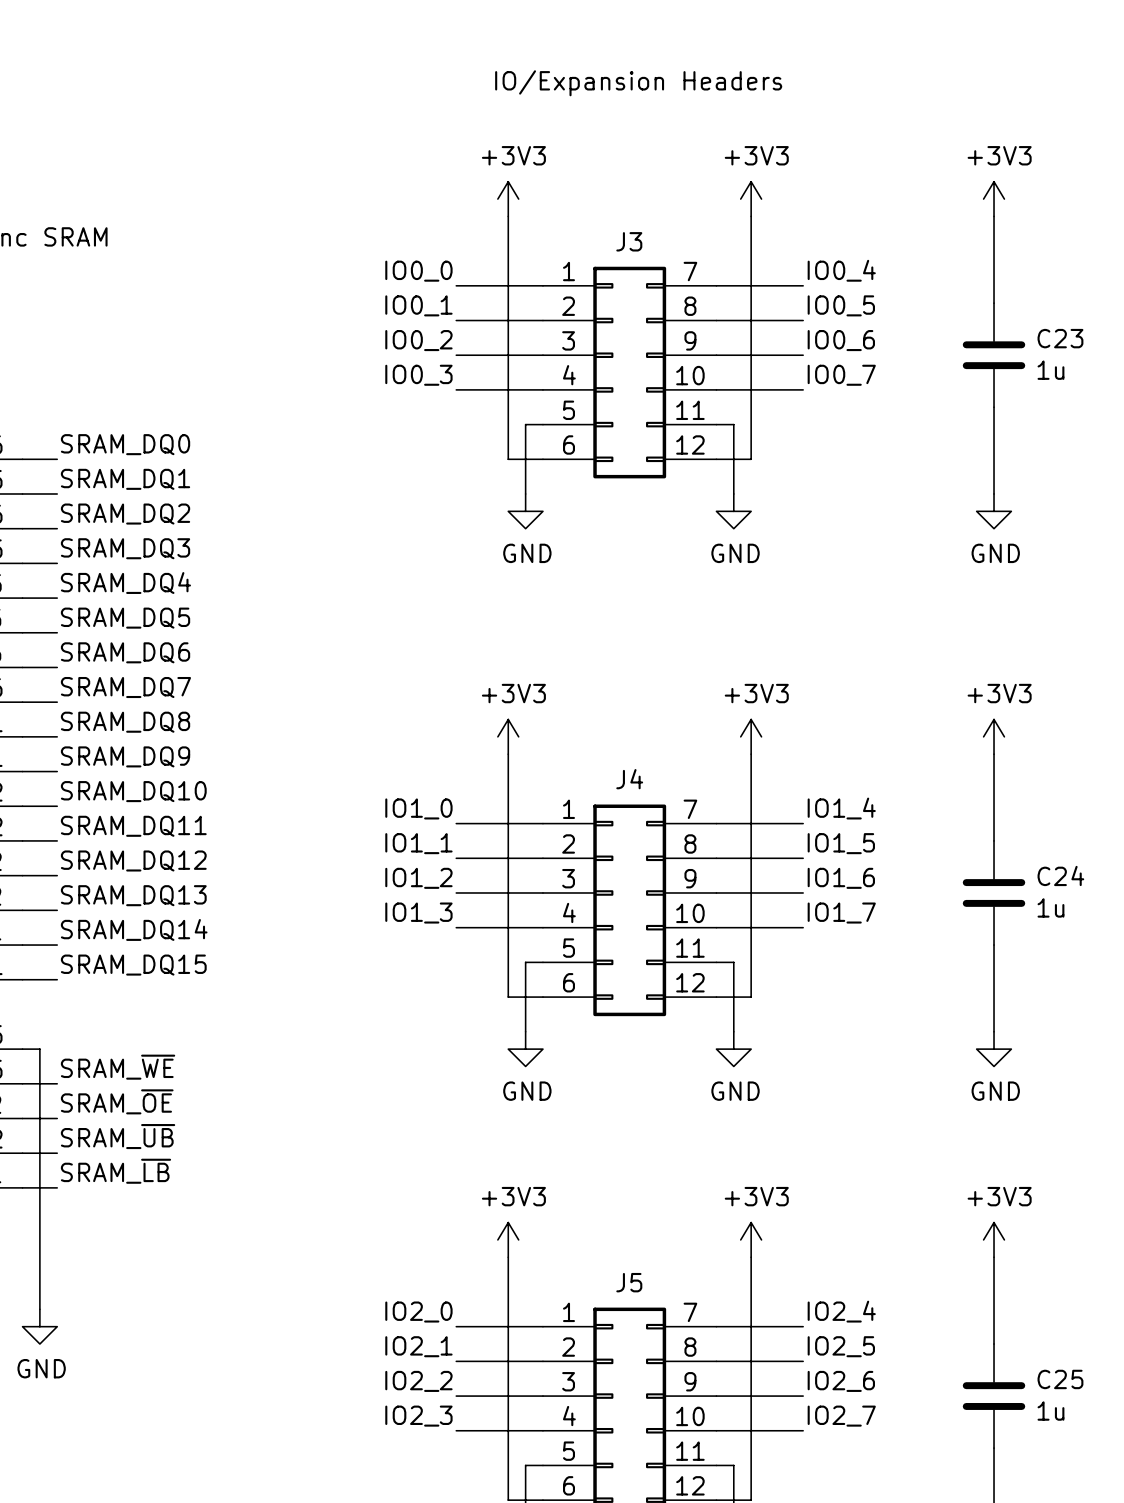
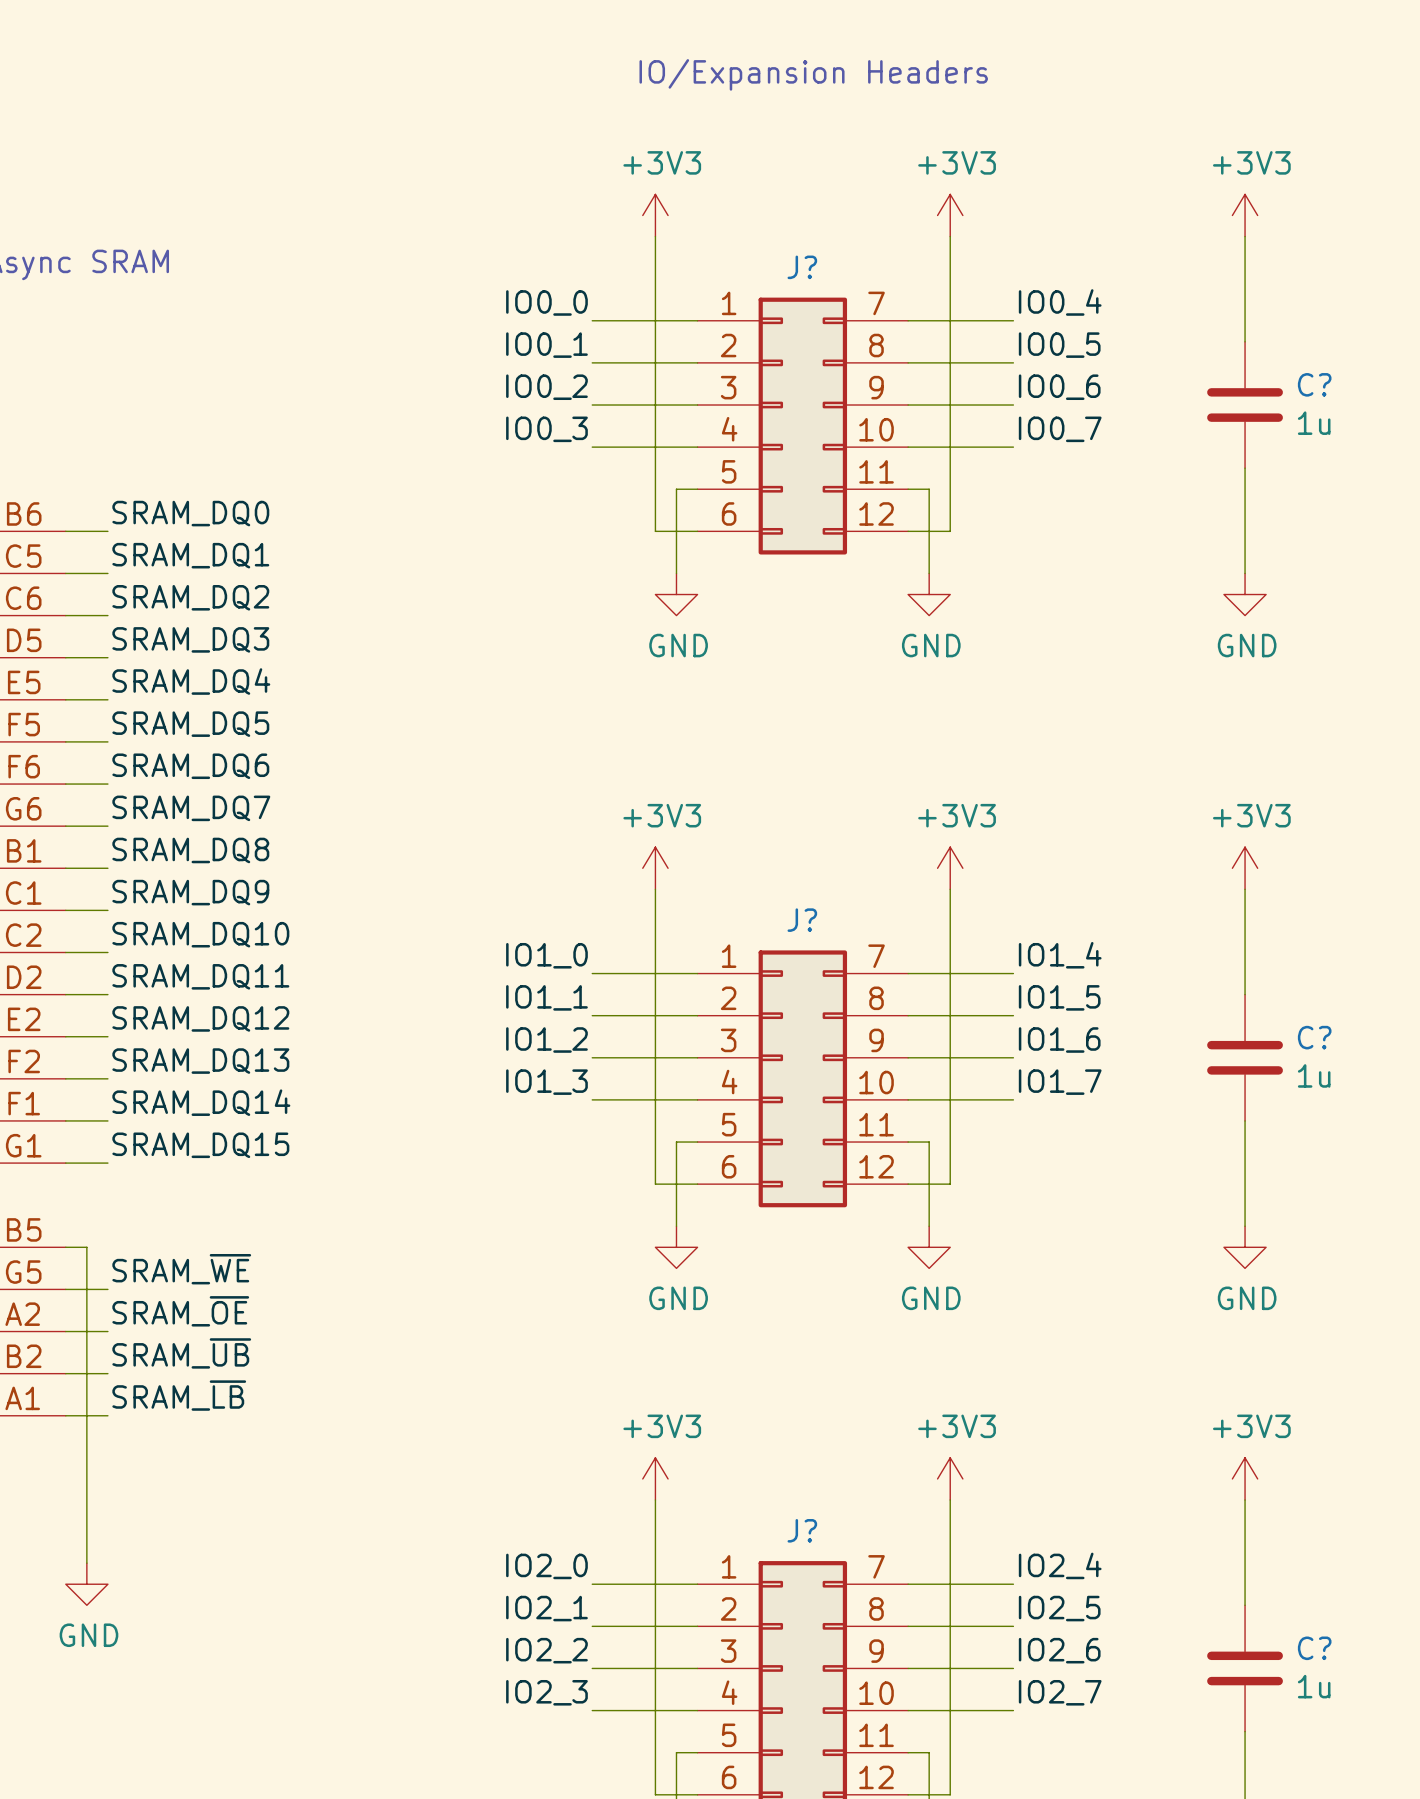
J3 name: J3 (629, 241) -> J? (802, 267)
C23 name: C23 (1060, 338) -> C? (1314, 384)
J4 name: J4 (629, 779) -> J? (802, 920)
C24 name: C24 (1060, 875) -> C? (1314, 1037)
J5 name: J5 (629, 1282) -> J? (802, 1530)
C25 name: C25 (1060, 1379) -> C? (1314, 1648)

